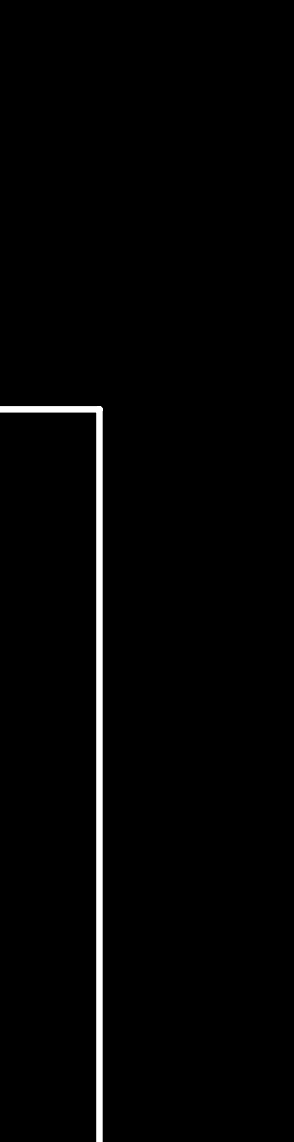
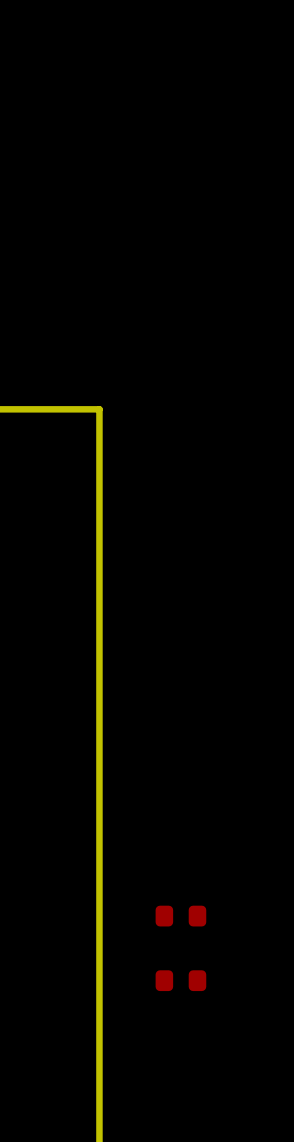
part: none -> (180, 916)
part: none -> (180, 980)

